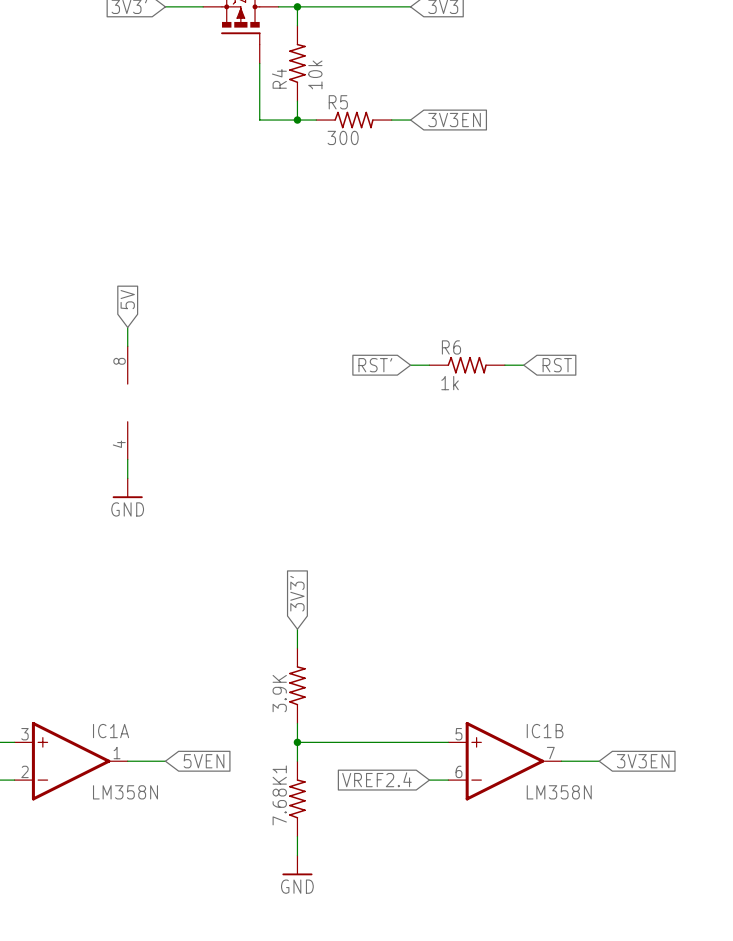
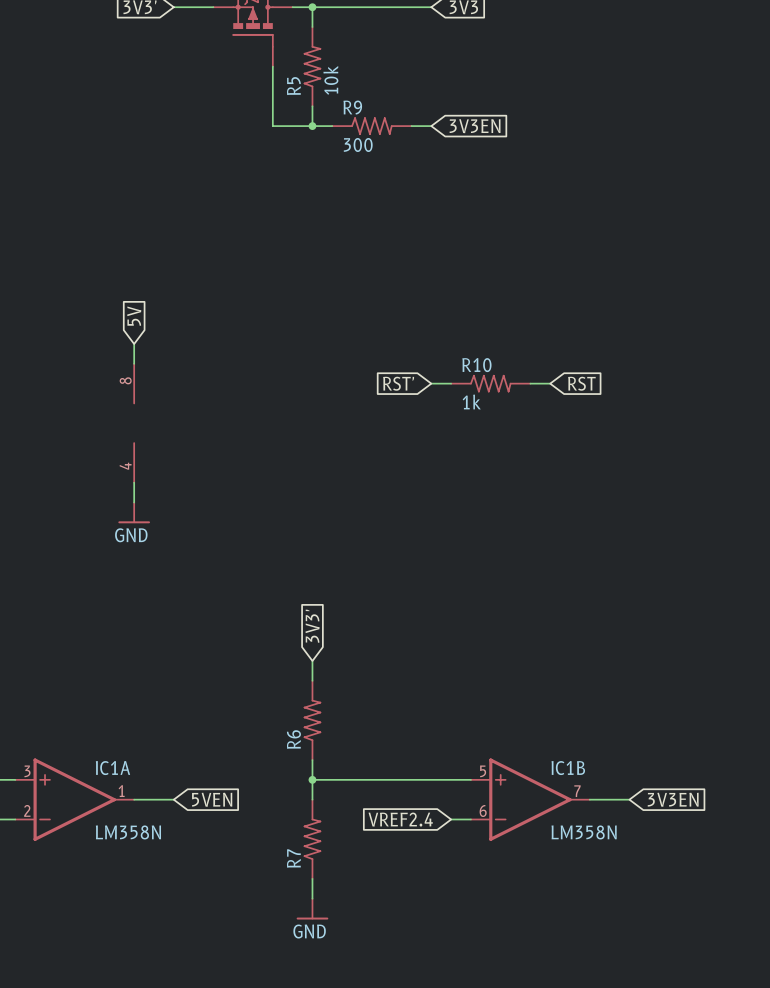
R4 name: R4 (279, 78) -> R5 (293, 86)
R5 name: R5 (338, 102) -> R9 (352, 107)
R6 name: R6 (451, 347) -> R10 (476, 365)
3.9K name: 3.9K (279, 693) -> R6 (293, 739)
7.68K1 name: 7.68K1 (279, 795) -> R7 (293, 858)

